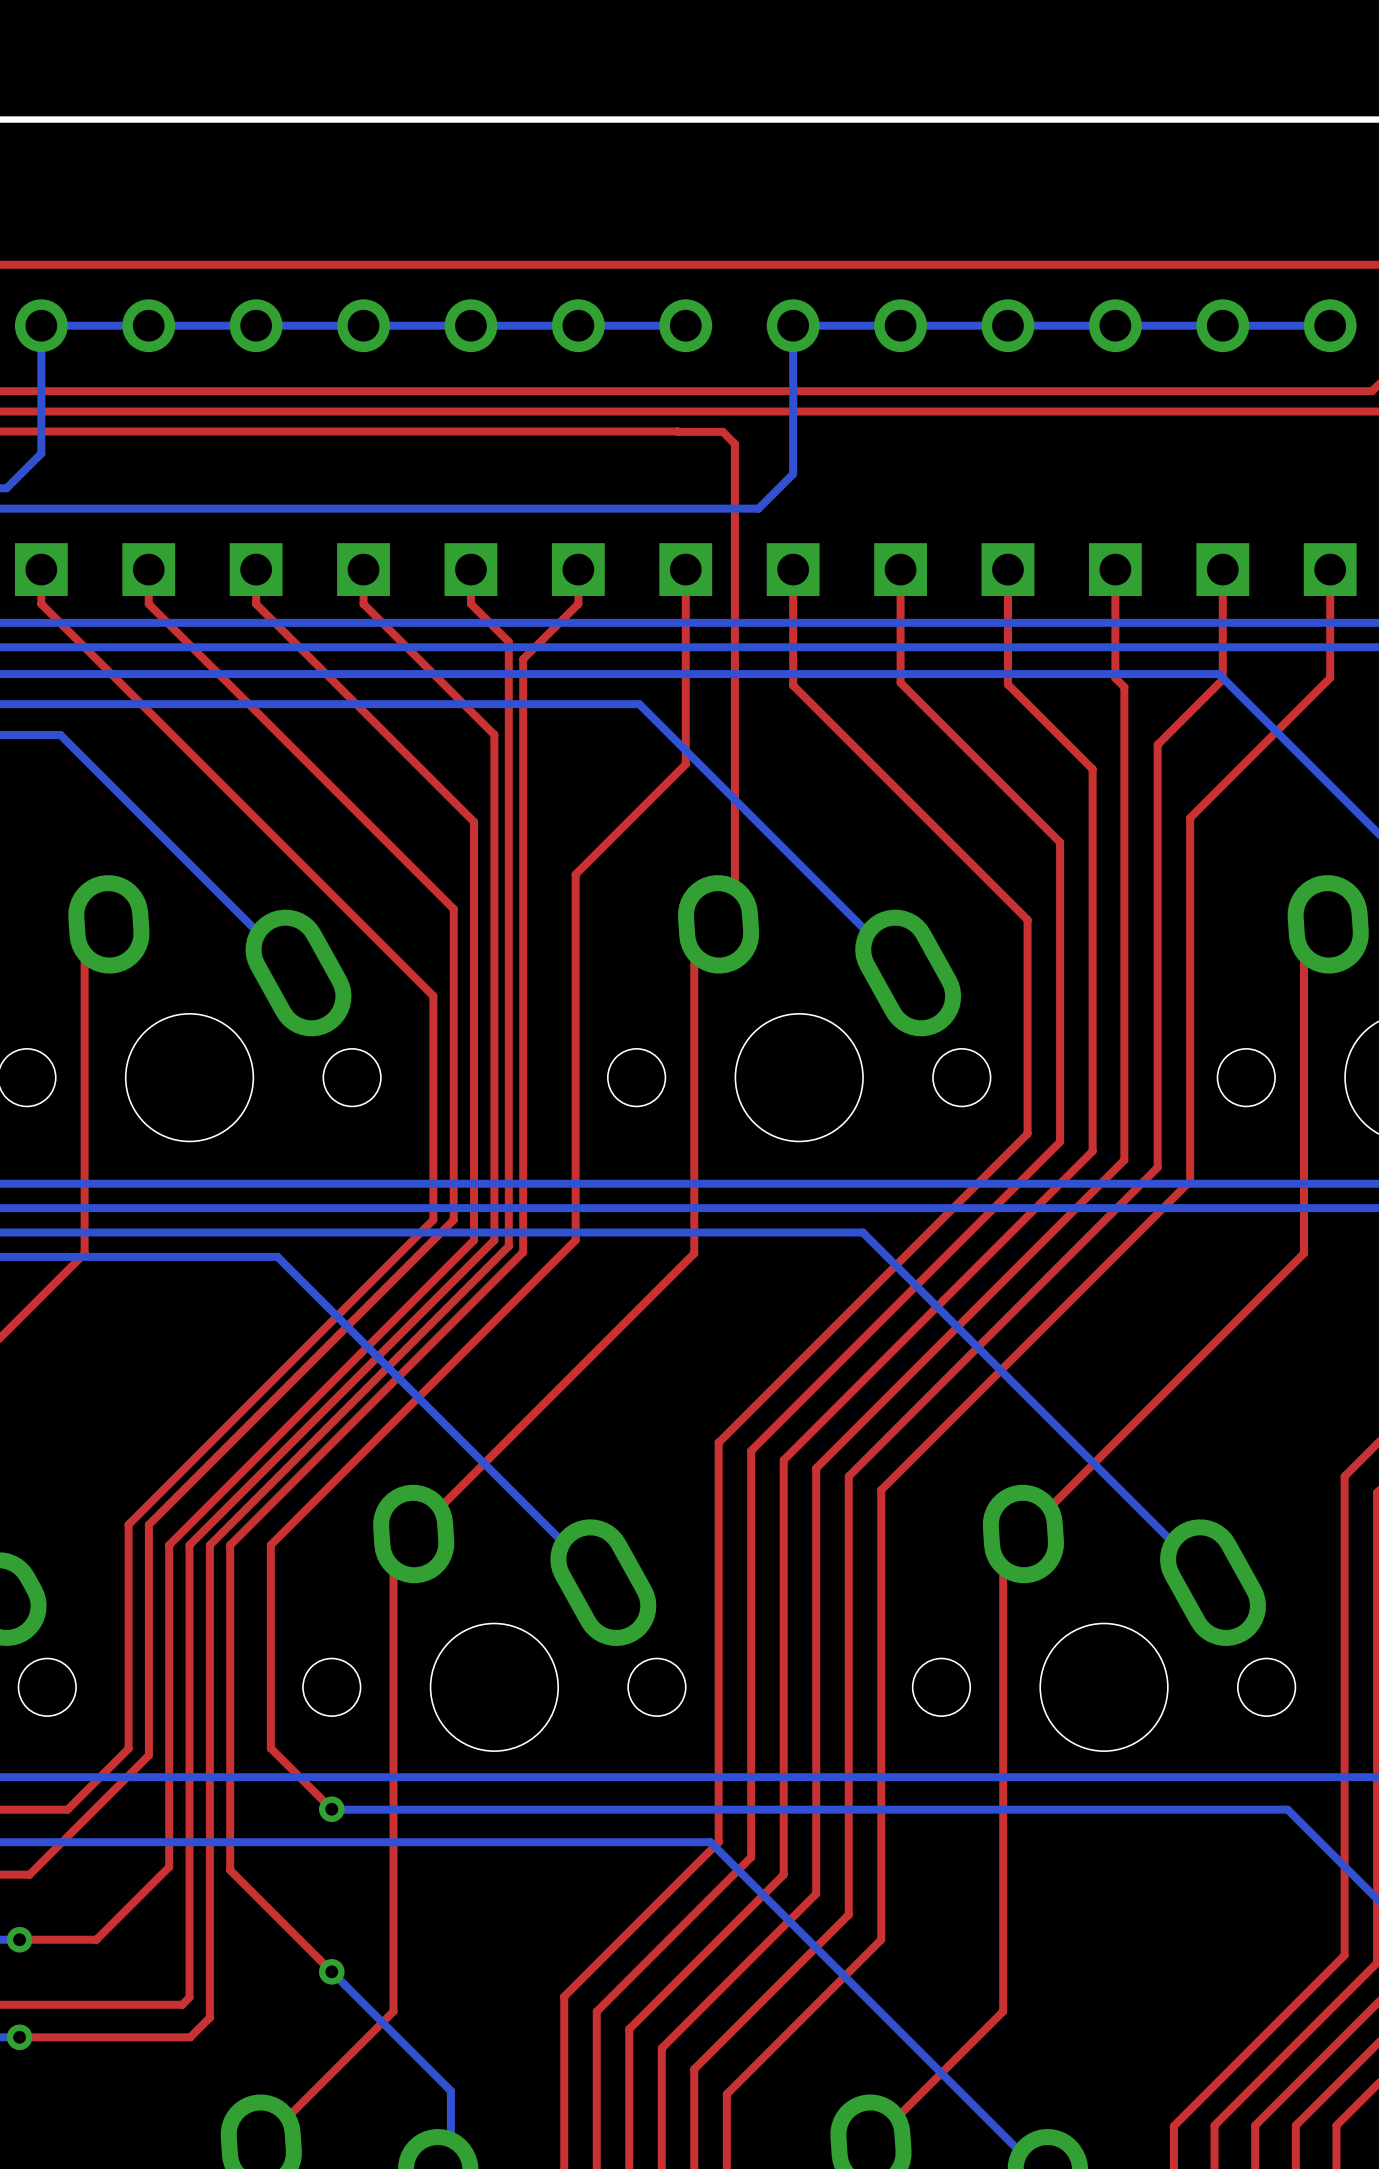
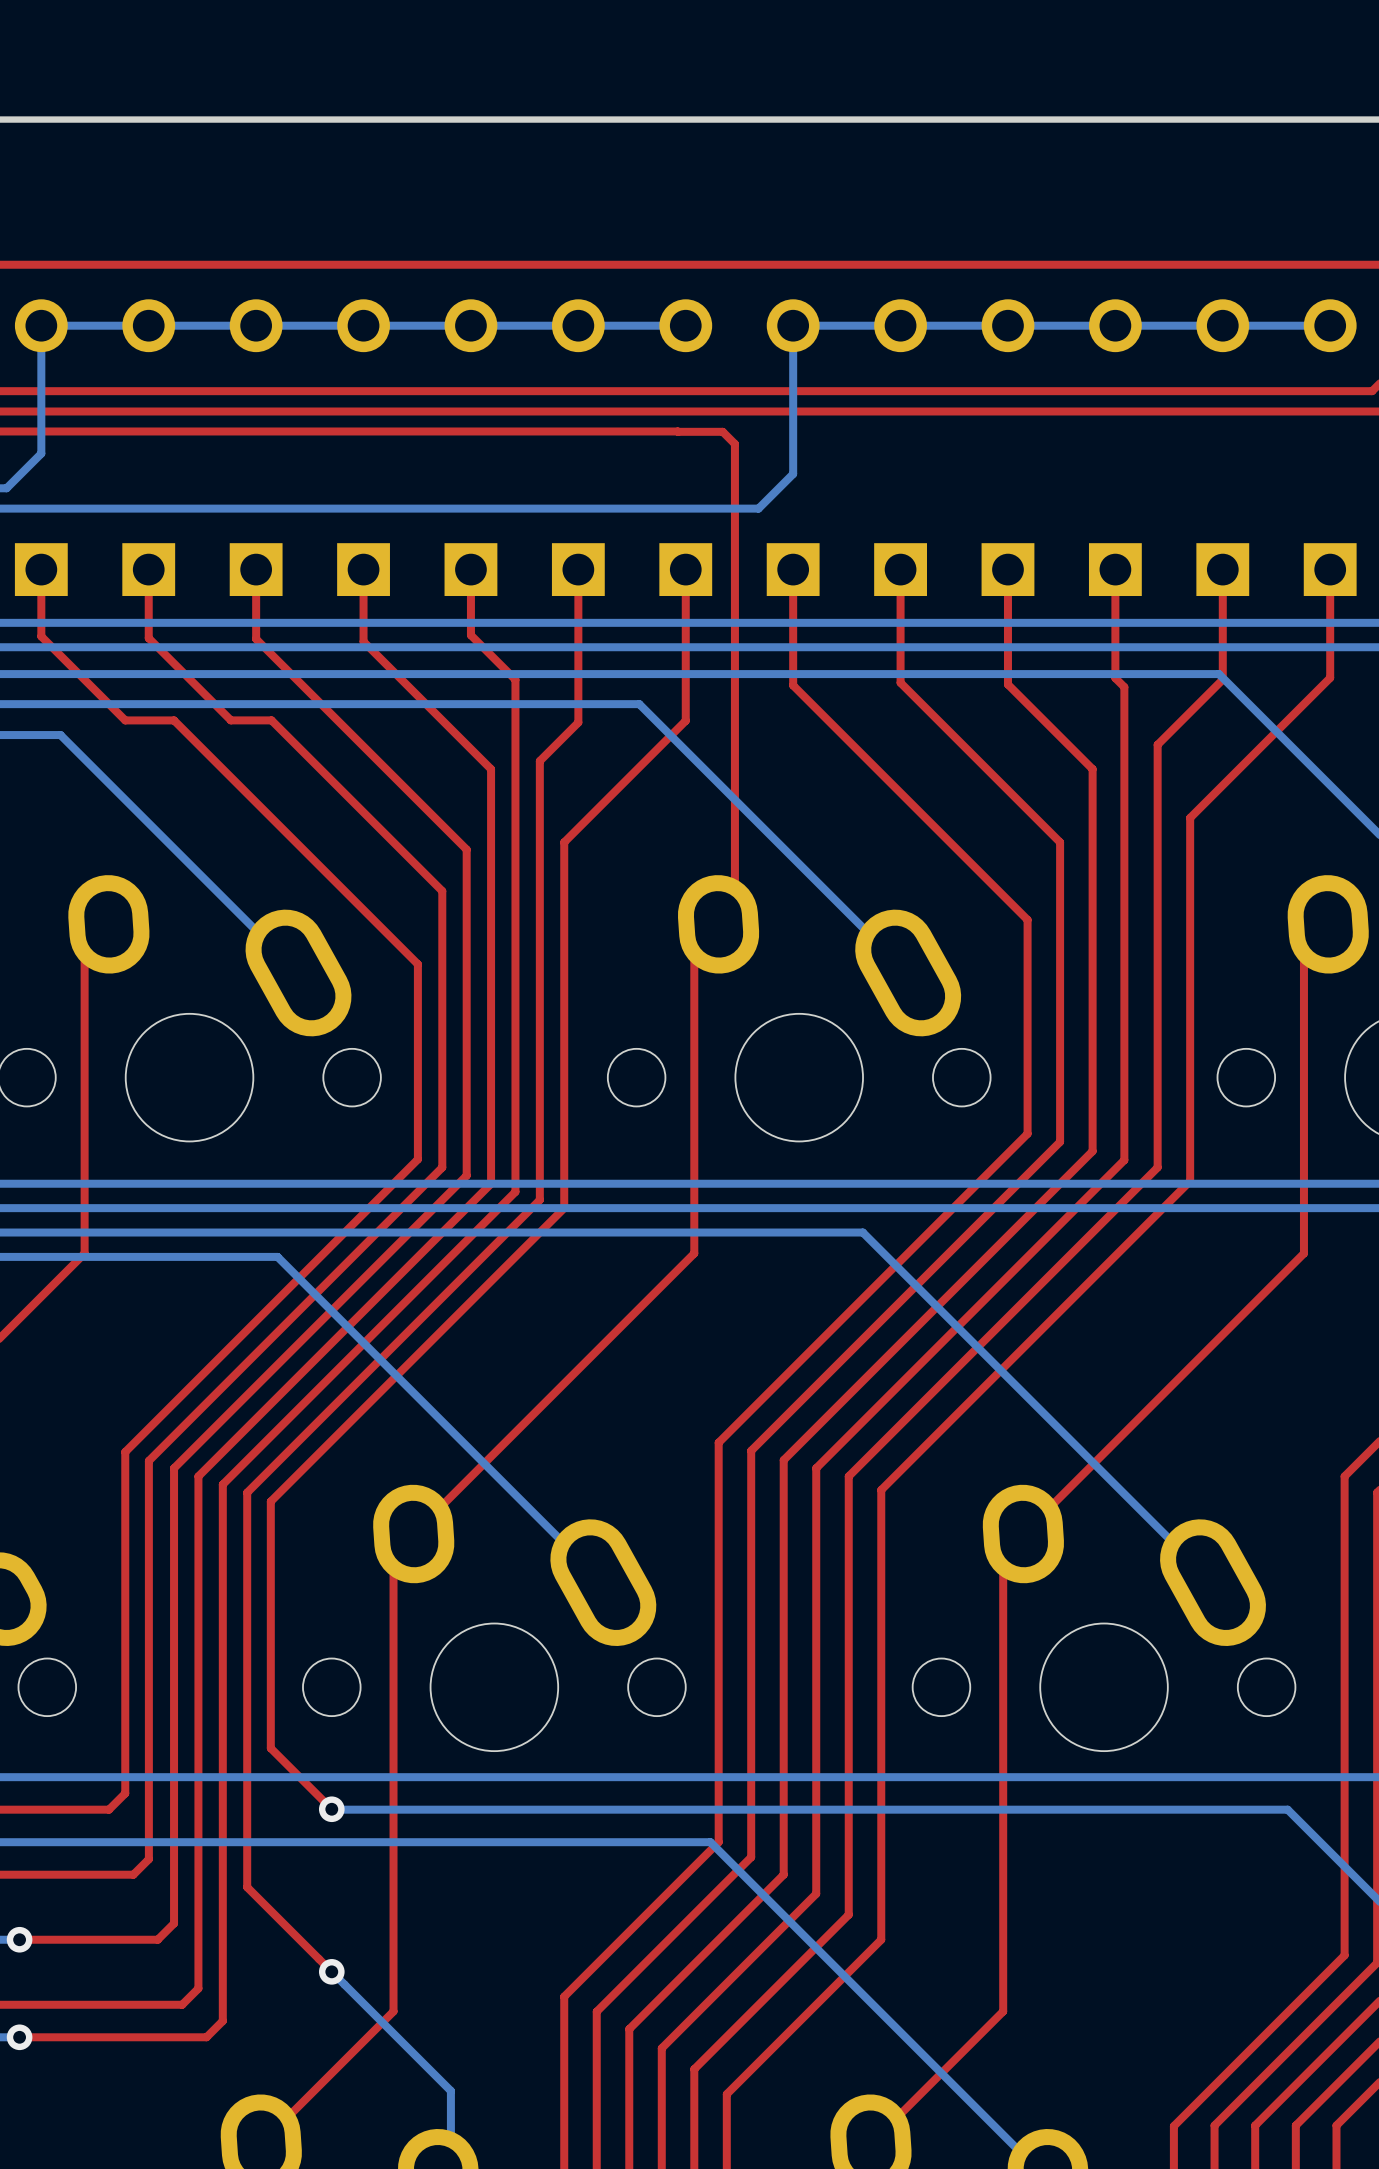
top track: (41, 604) (433, 996) (433, 1219) (128, 1524) (128, 1748) (67, 1809) -> (41, 604) (41, 636) (125, 720) (174, 720) (417, 964) (417, 1159) (125, 1452) (125, 1793) (109, 1809) (67, 1809)
top track: (148, 604) (453, 908) (453, 1219) (148, 1524) -> (148, 604) (148, 638) (230, 720) (271, 720) (442, 891) (442, 1167) (148, 1460) (148, 1524)
top track: (256, 604) (474, 821) (474, 1240) (169, 1545) (169, 1867) (96, 1939) -> (256, 604) (256, 639) (466, 849) (466, 1175) (174, 1468) (174, 1923) (157, 1939) (96, 1939)
top track: (363, 604) (494, 734) (494, 1240) (189, 1545) (189, 1997) -> (363, 604) (363, 641) (491, 769) (491, 1183) (198, 1476) (198, 1988) (189, 1997)
top track: (470, 604) (508, 641) (508, 1246) (209, 1545) (209, 2017) (190, 2037) -> (470, 604) (470, 635) (515, 679) (515, 1191) (222, 1484) (222, 2021) (206, 2037) (190, 2037)
top track: (578, 604) (523, 659) (523, 1252) (230, 1545) (230, 1870) (247, 1887) -> (578, 604) (578, 722) (539, 761) (539, 1200) (247, 1492) (247, 1887)
top track: (685, 720) (685, 764) (575, 874) (575, 1240) (270, 1545) -> (685, 720) (564, 842) (564, 1208) (270, 1501) (270, 1545)
top track: (148, 1755) (29, 1874) -> (148, 1755) (148, 1859) (133, 1874) (29, 1874)

